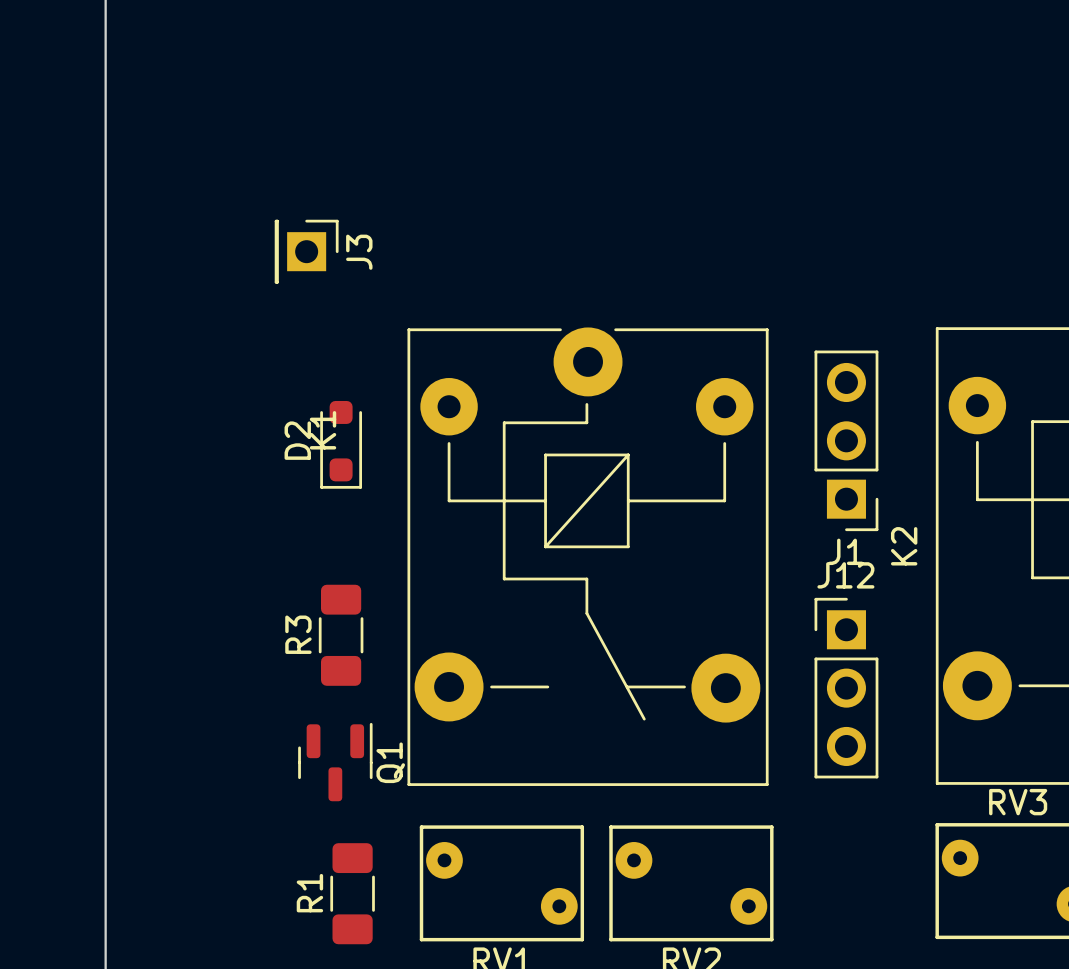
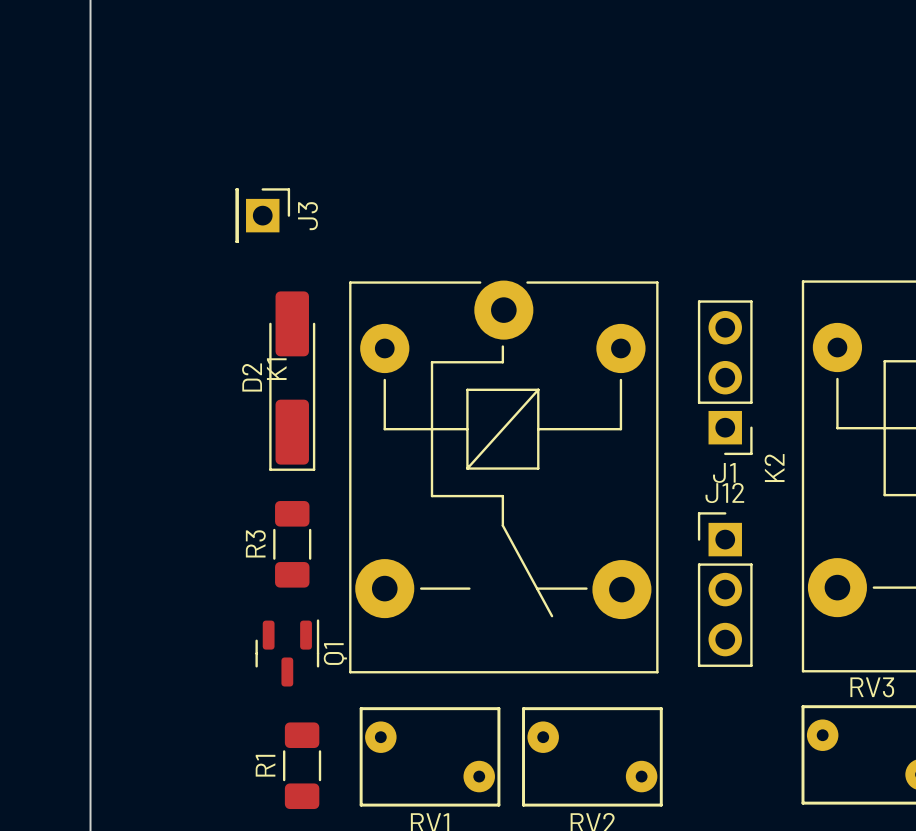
D2 footprint: [320, 400, 363, 489] -> [269, 291, 316, 471]

